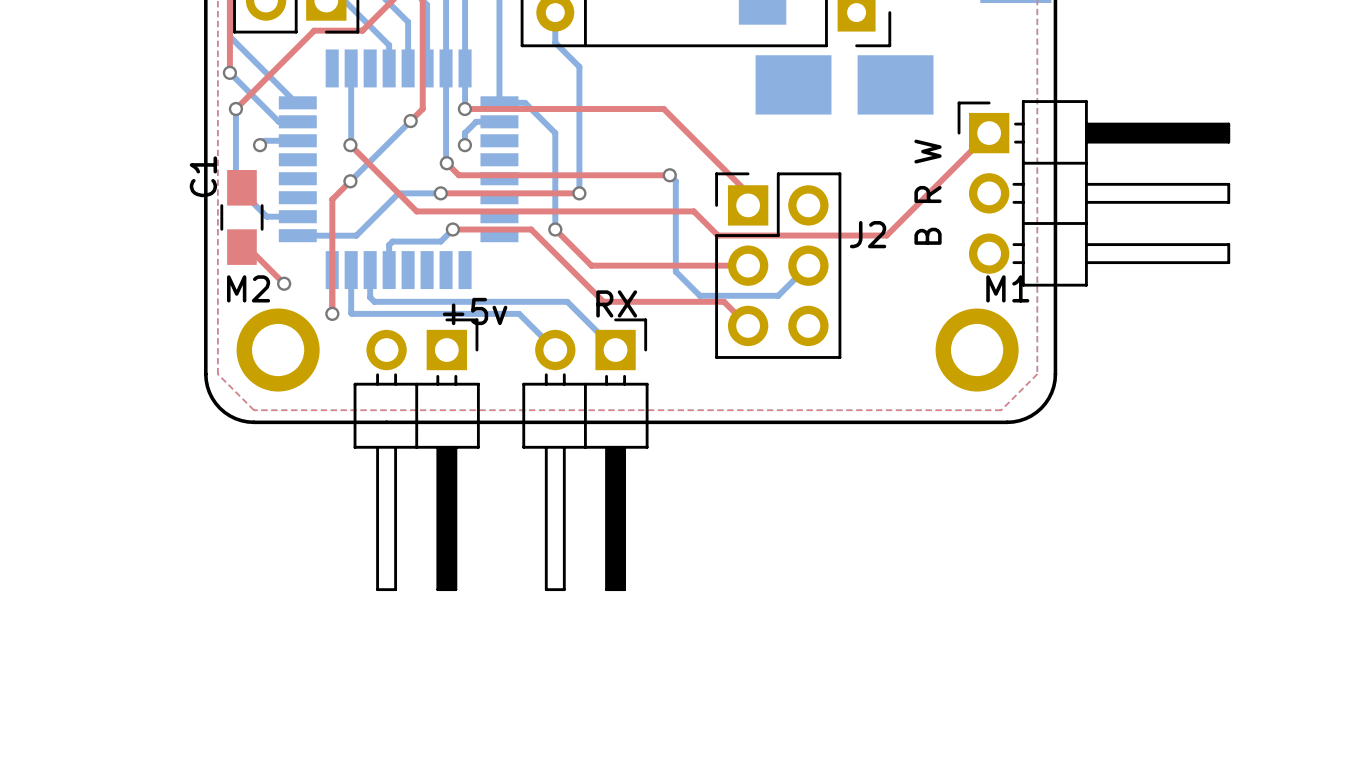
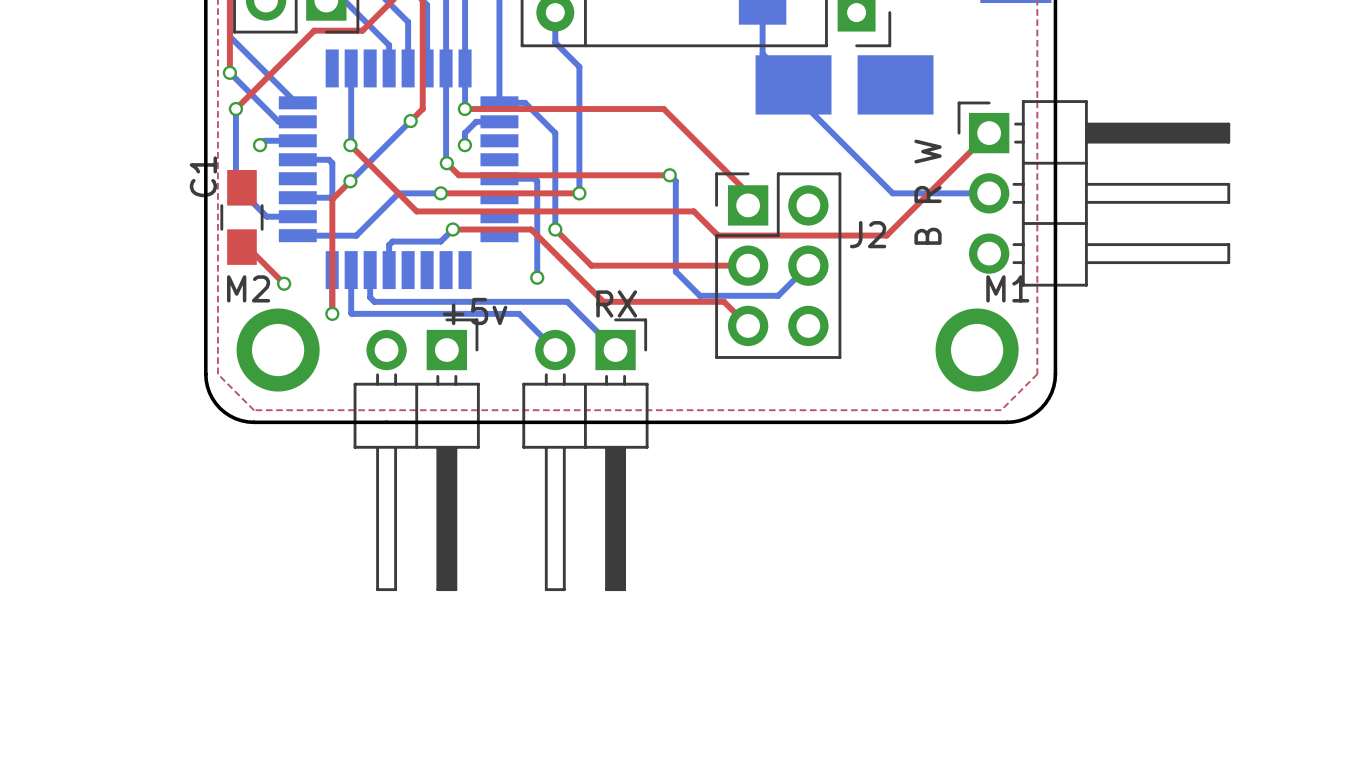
bottom track: none -> (762, 6) (762, 53) (793, 84) (793, 94) (892, 193) (989, 193)
bottom track: none -> (297, 159) (328, 159) (332, 163) (332, 196) (330, 197) (297, 197)
bottom track: none -> (499, 178) (534, 178) (537, 181) (537, 277)
via: none -> (537, 277)

